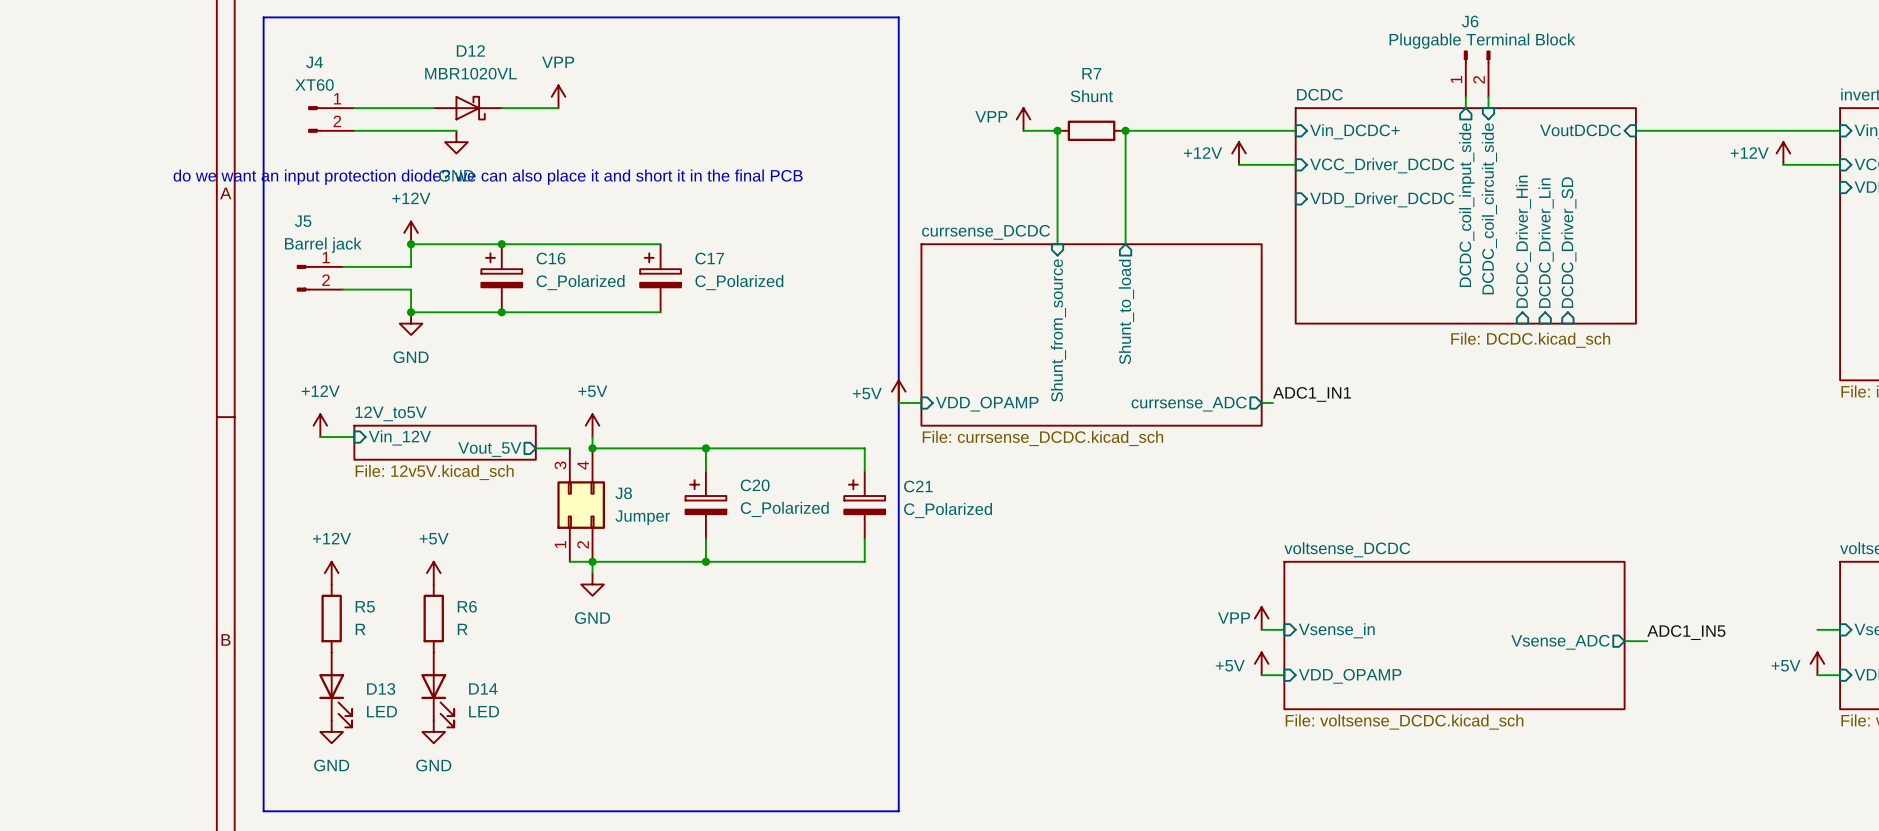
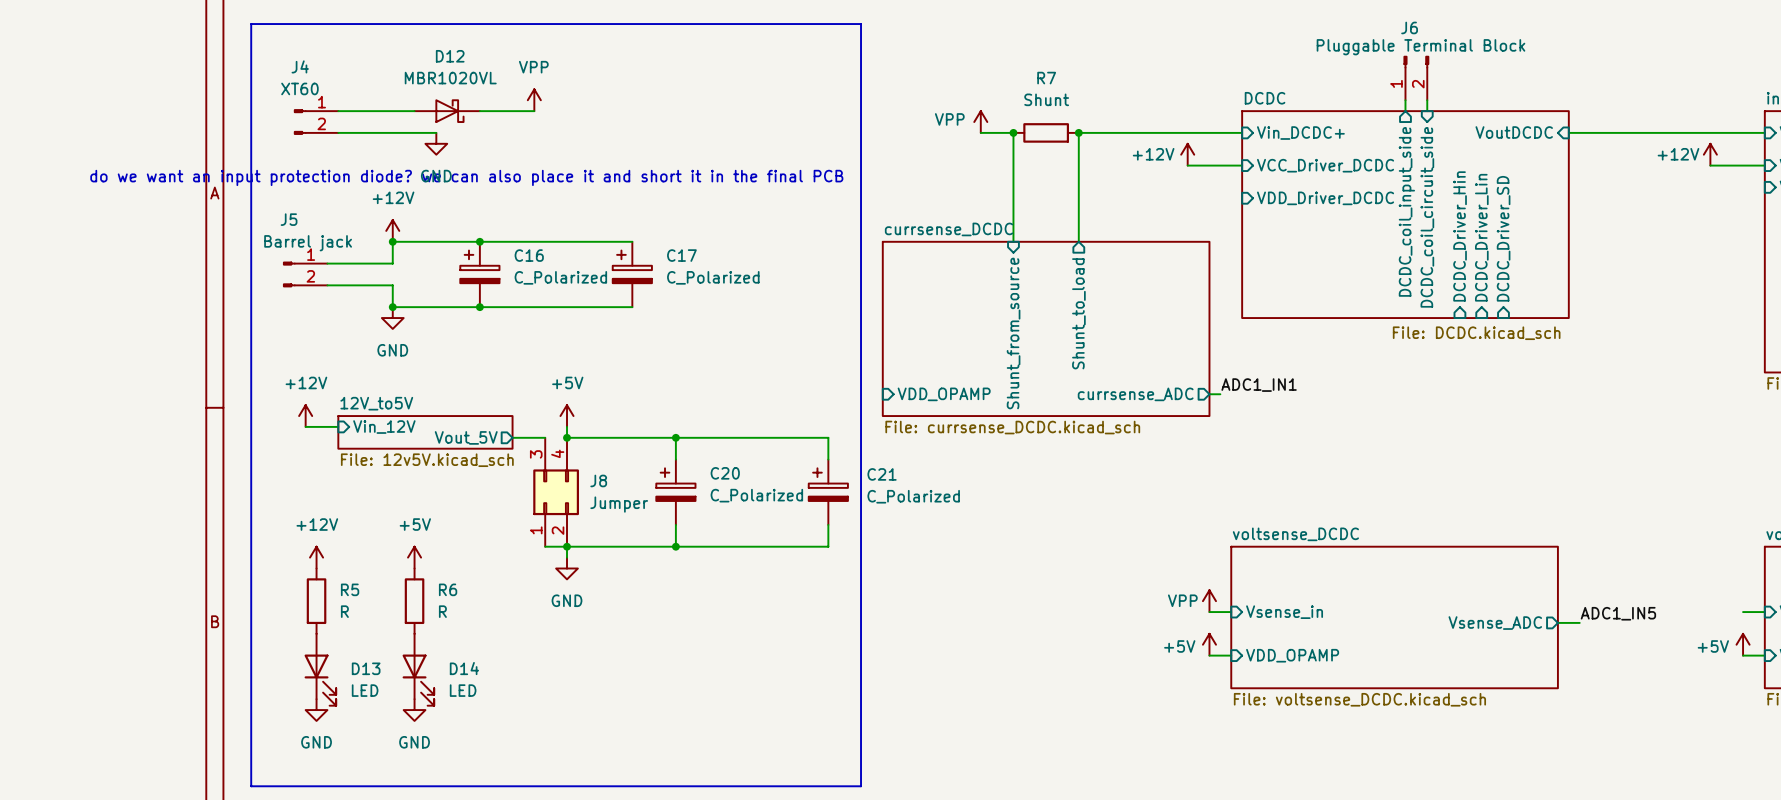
power symbol: +5V (898, 391) -> none
wire: (898, 403) (921, 403) -> none

